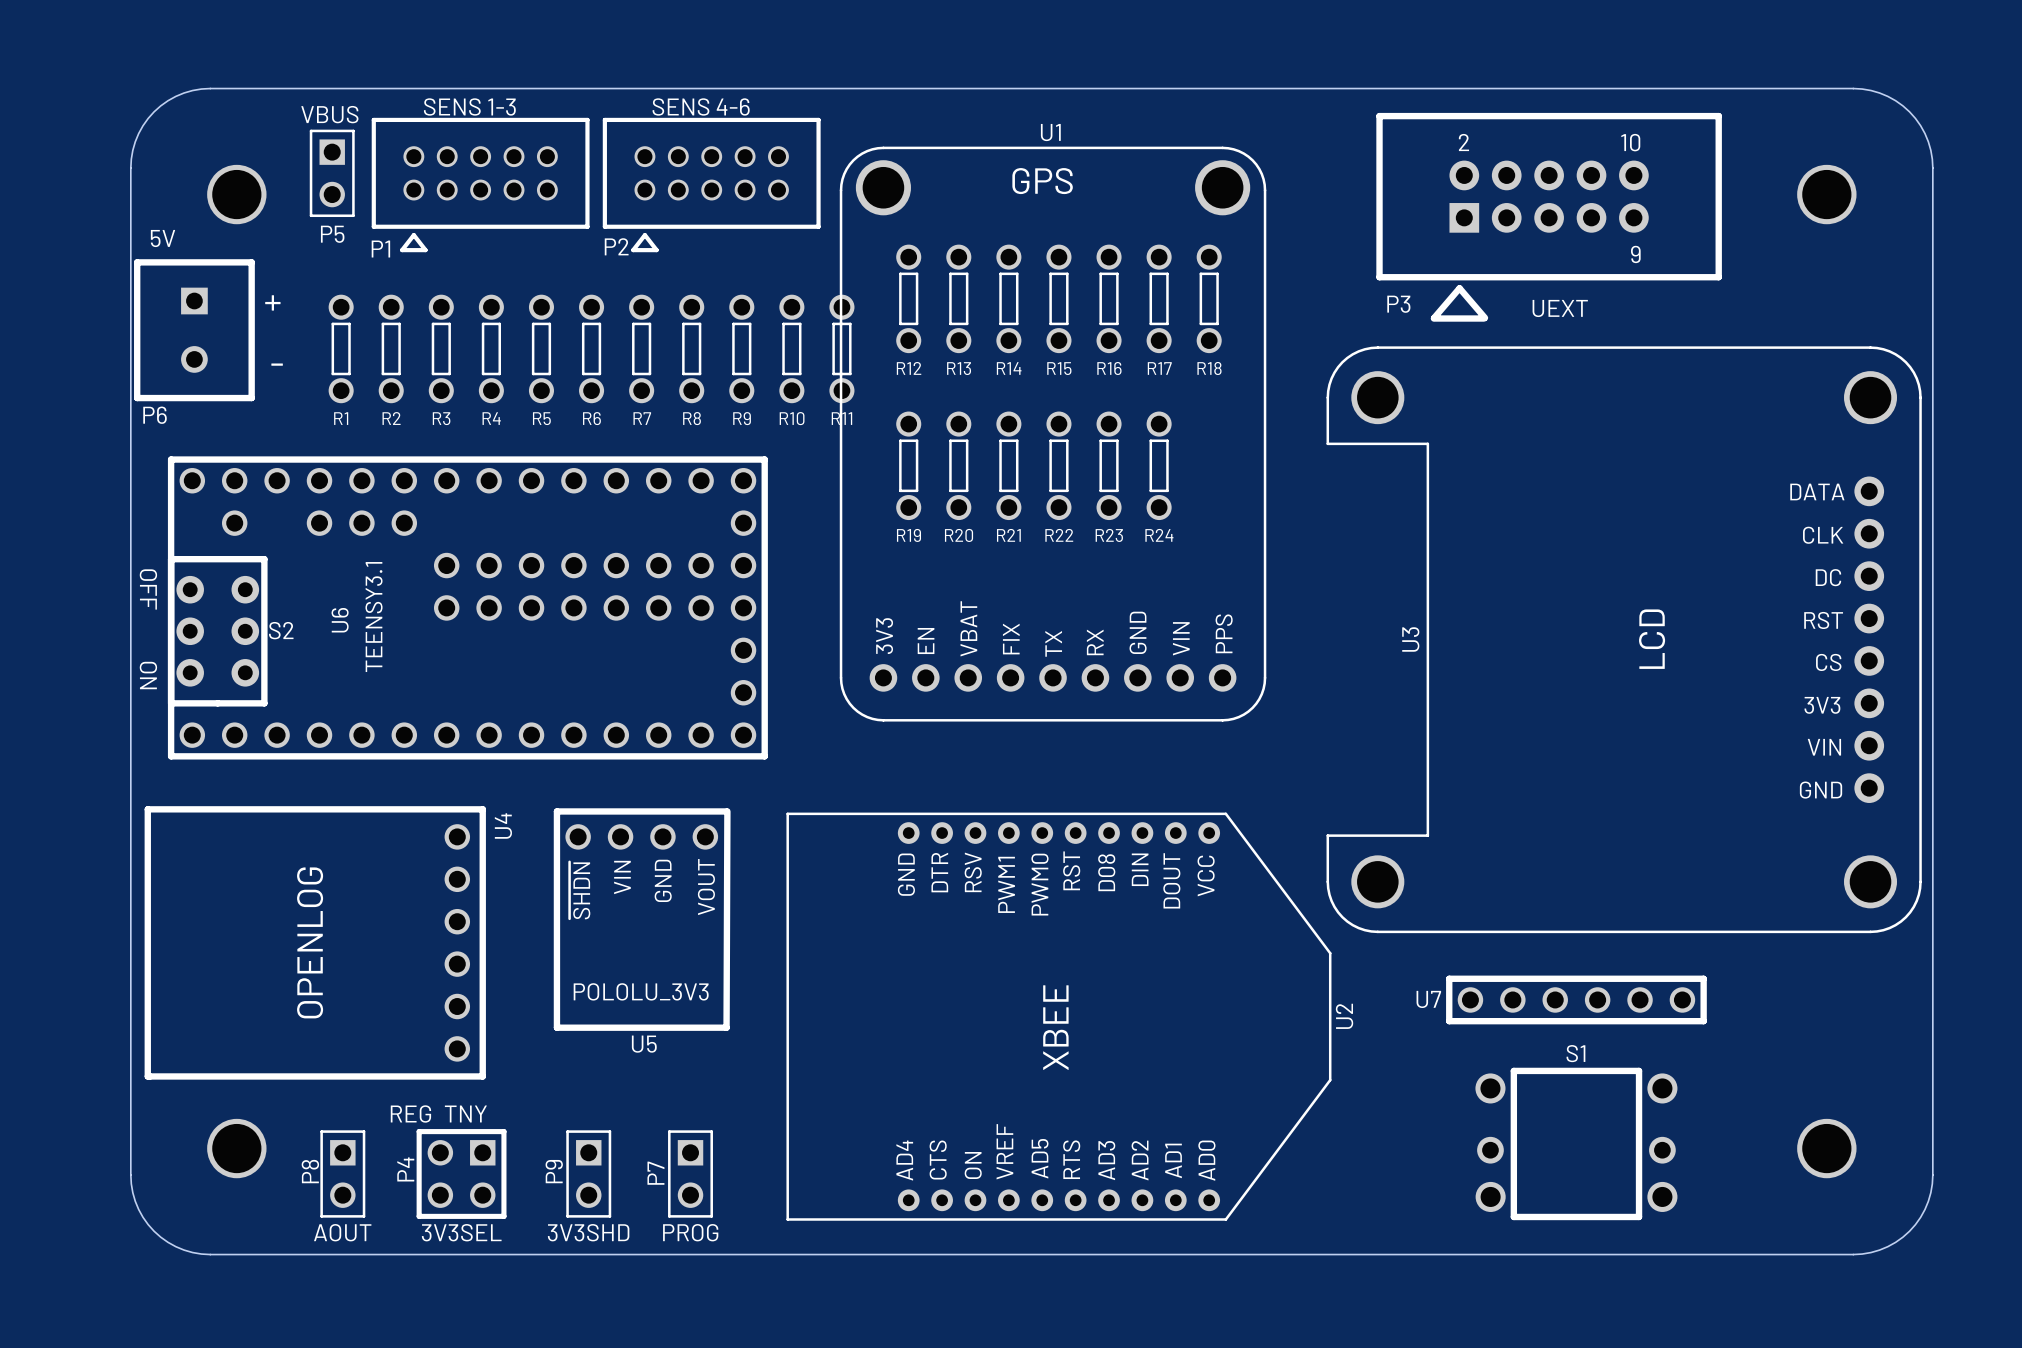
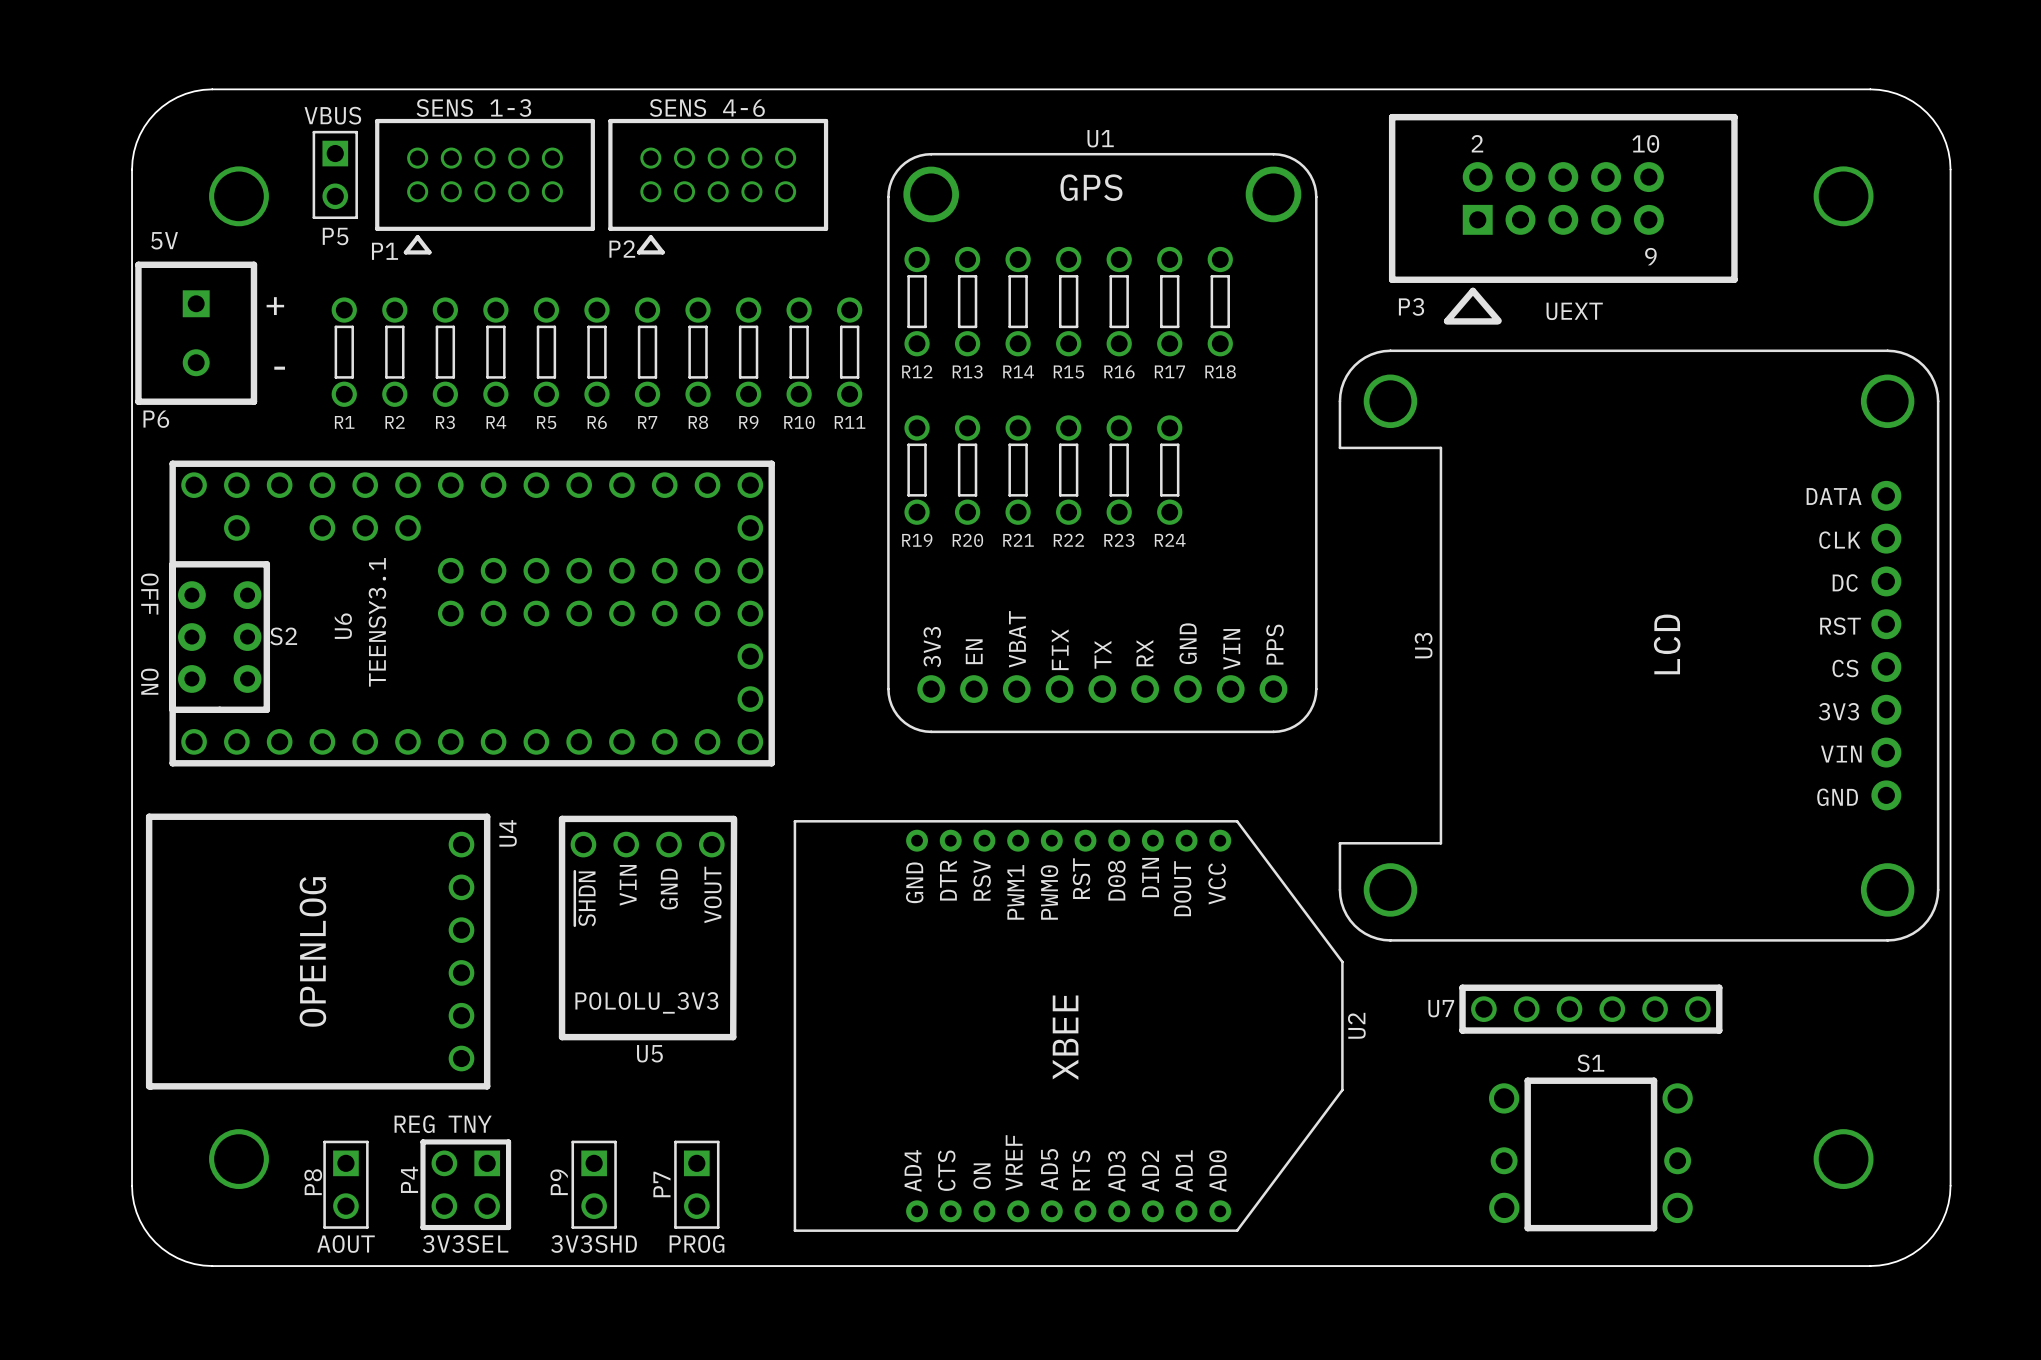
U1 position: (1053, 434) -> (1102, 443)

